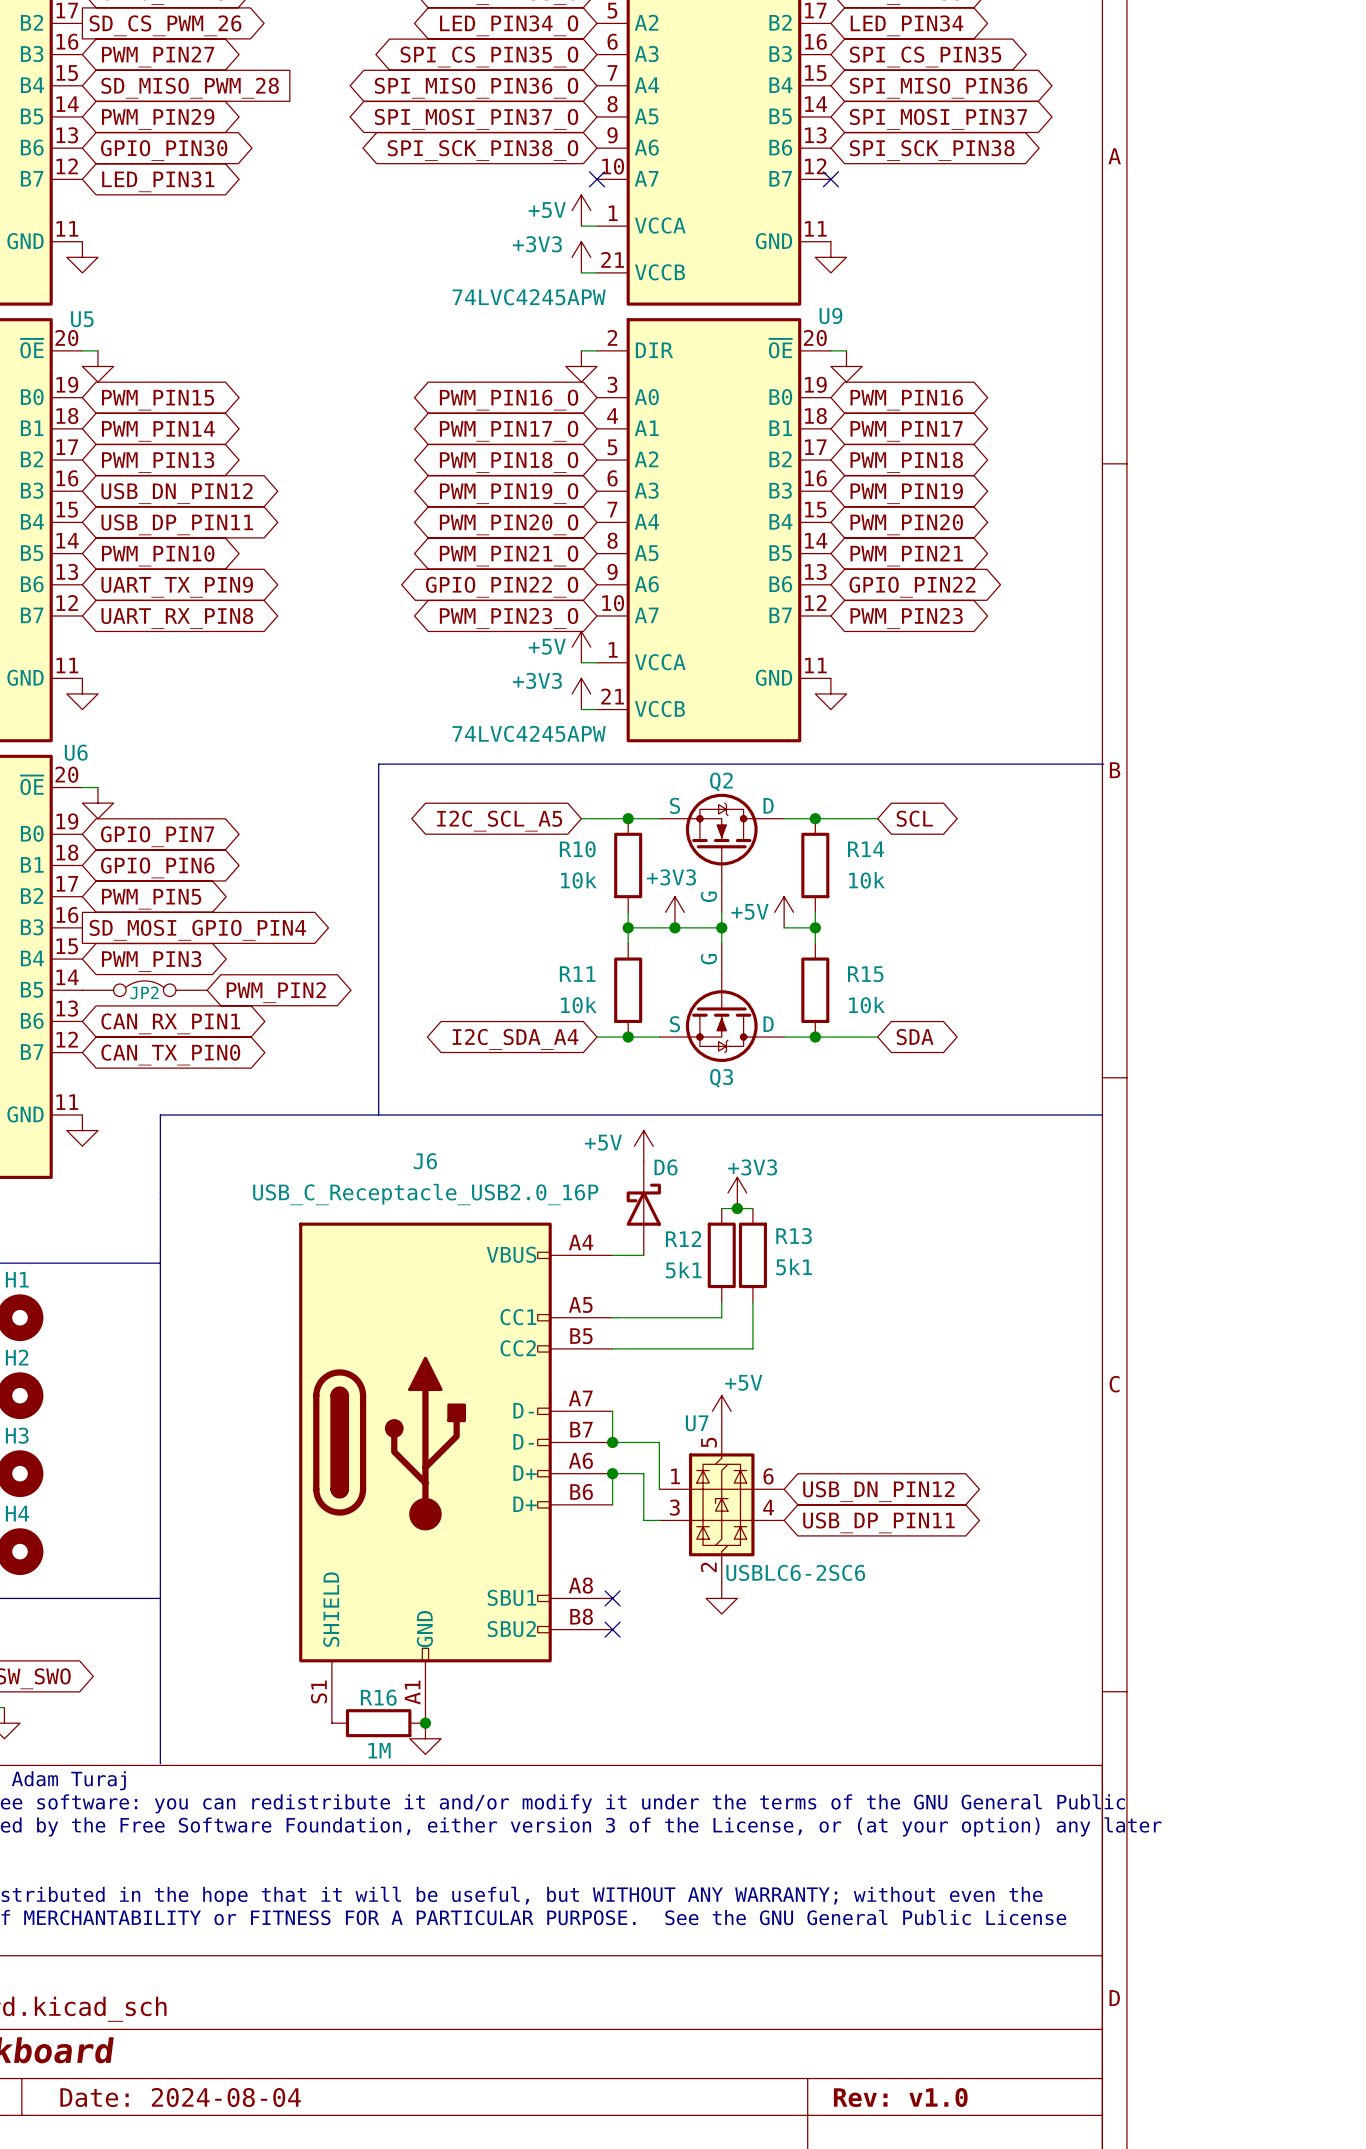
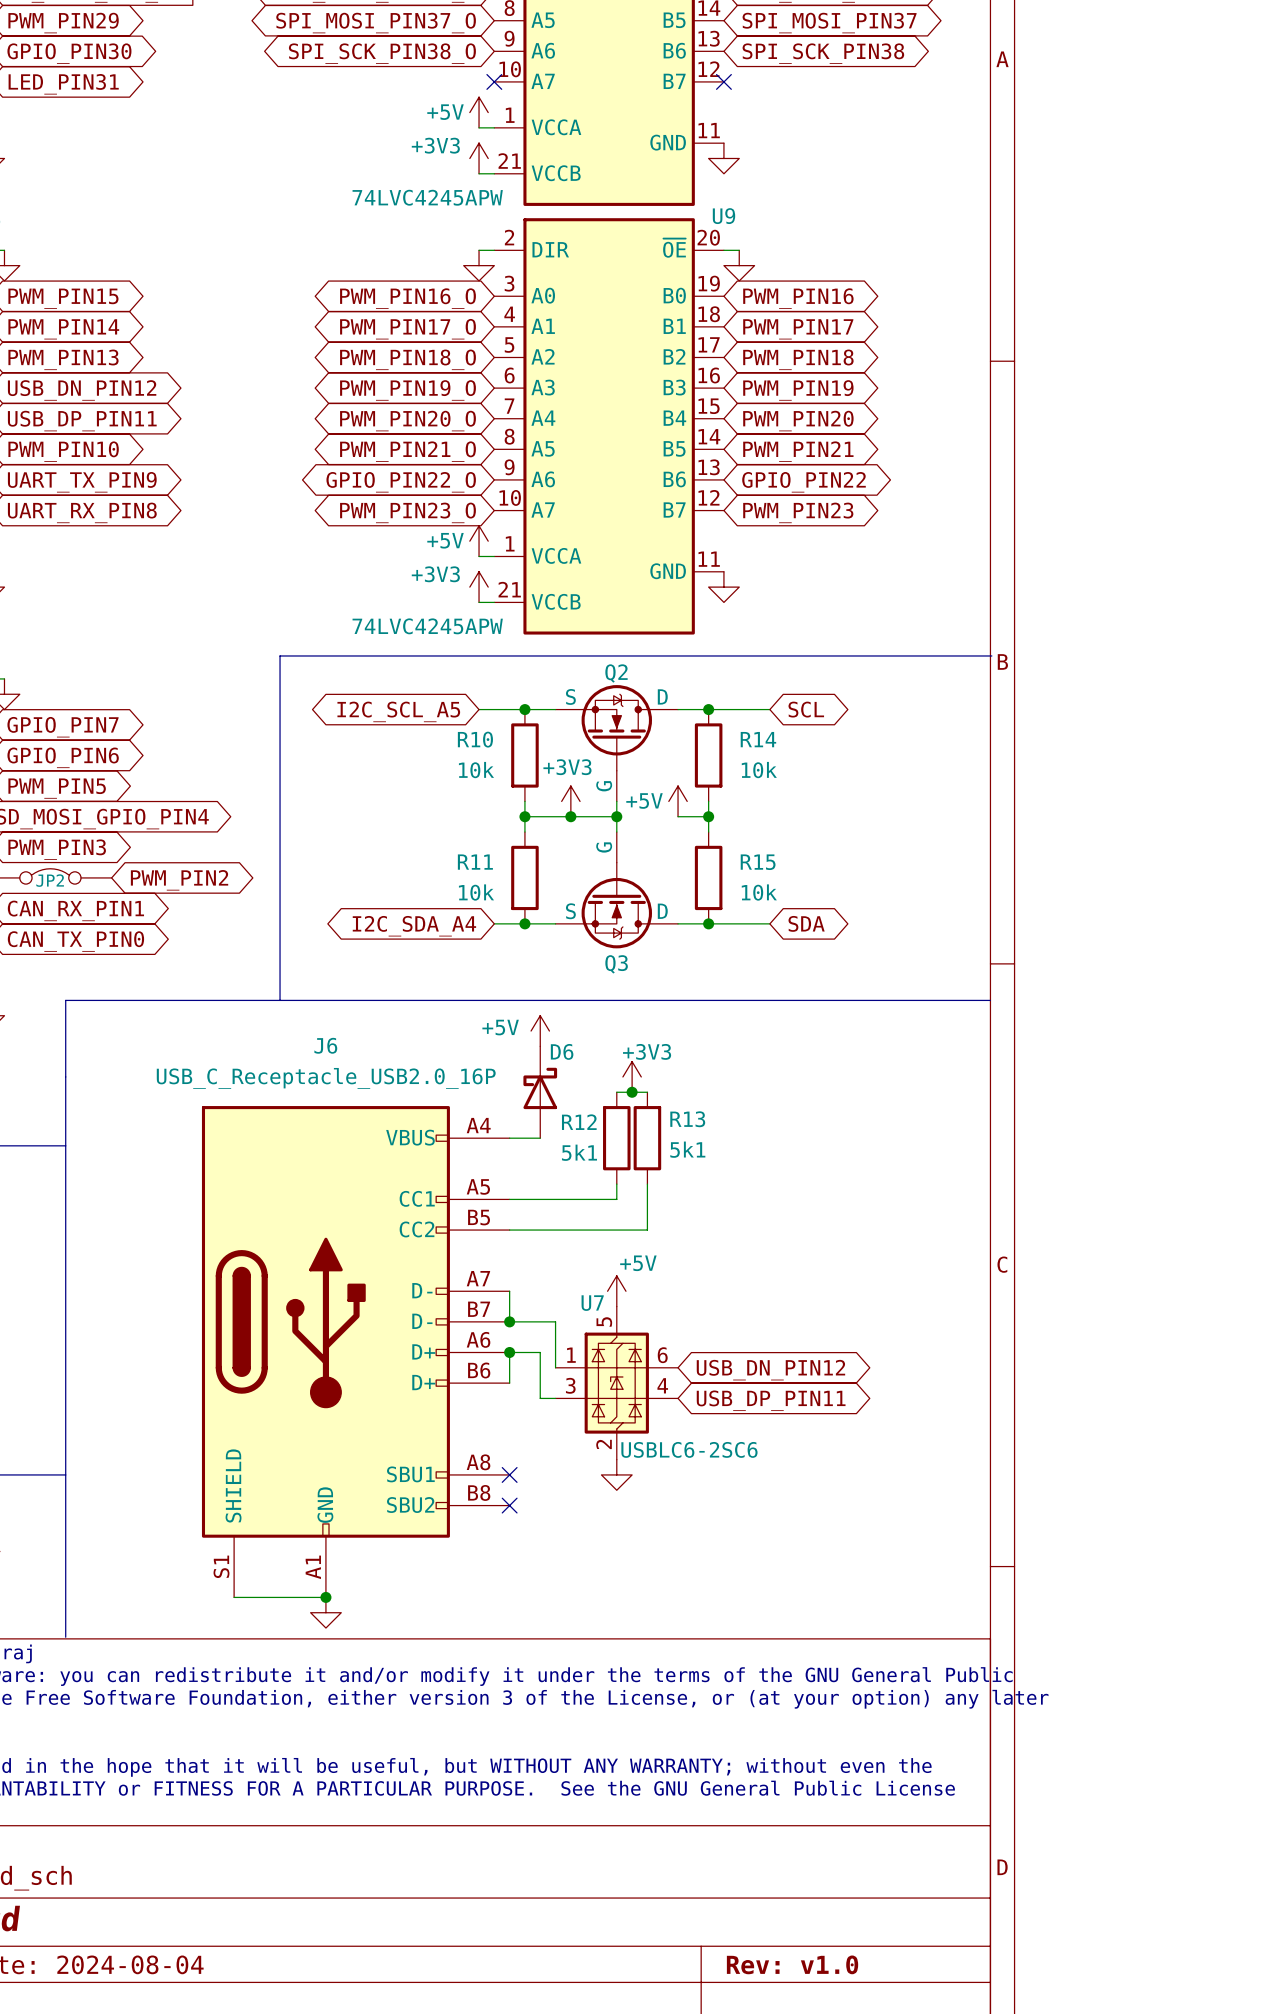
wire: none -> (234, 1597) (325, 1597)
R16: 1M (378, 1723) -> none

